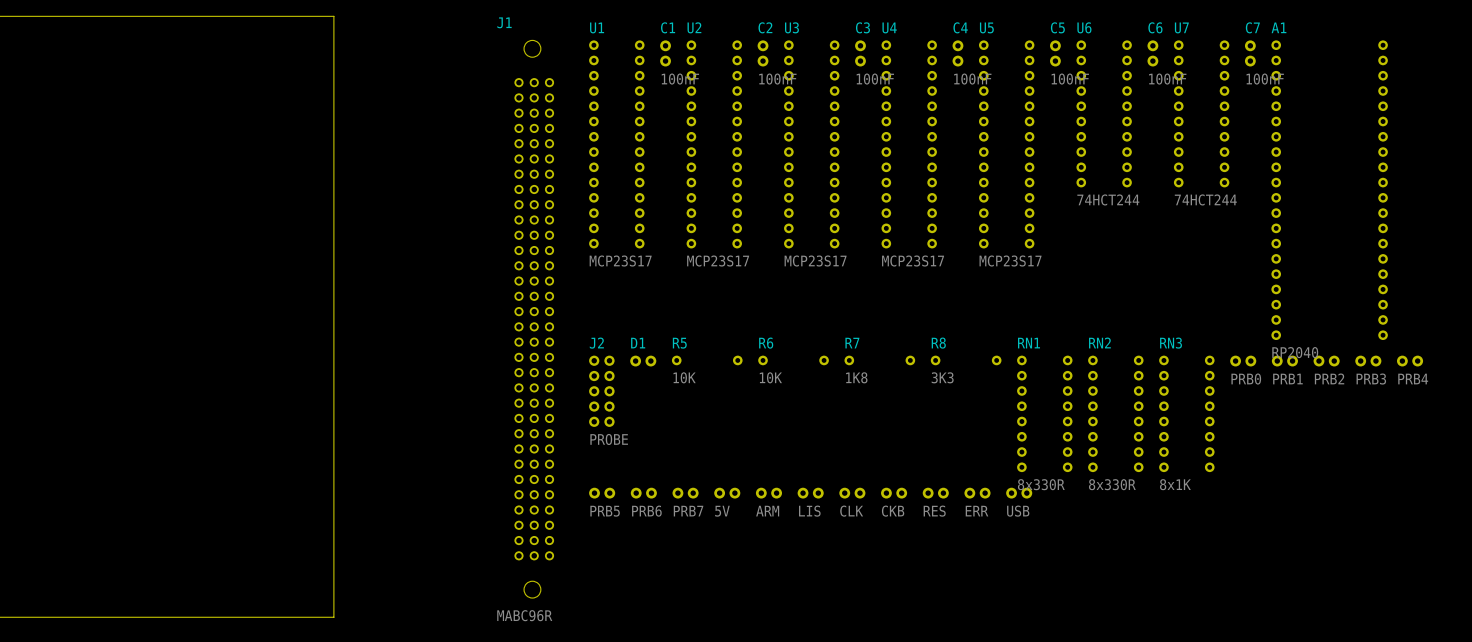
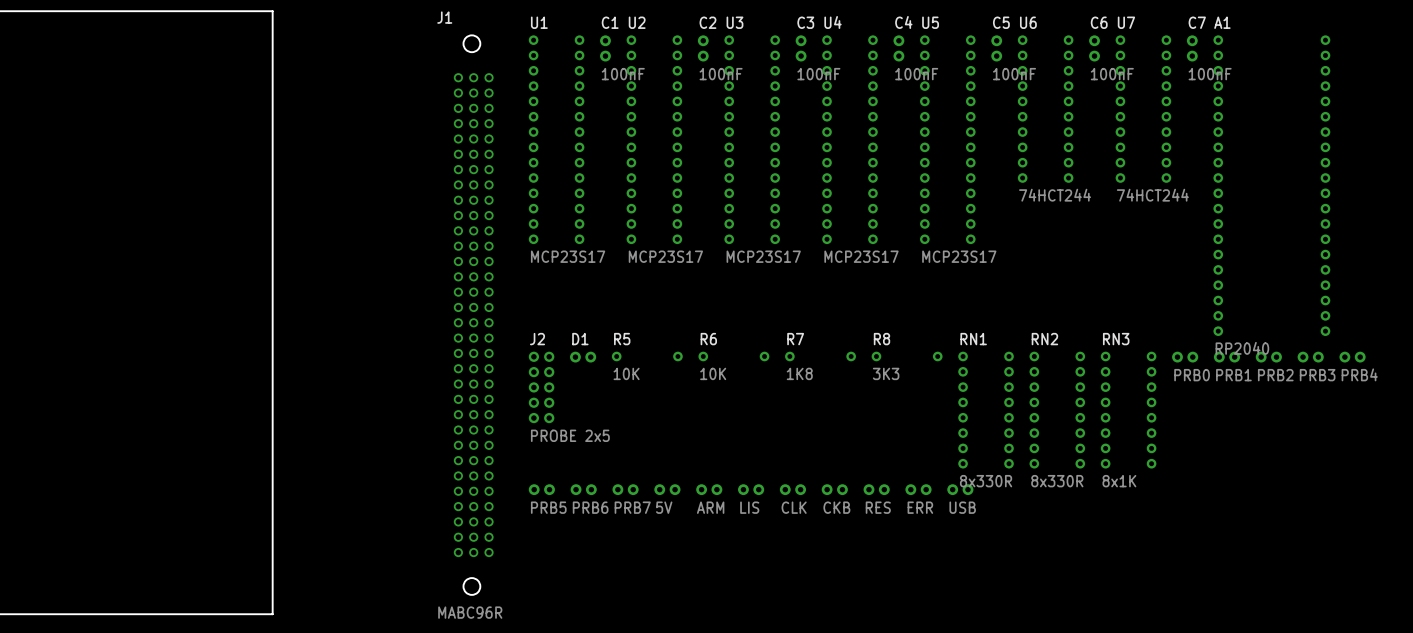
J2 value: PROBE (609, 439) -> PROBE 2x5 (570, 435)

